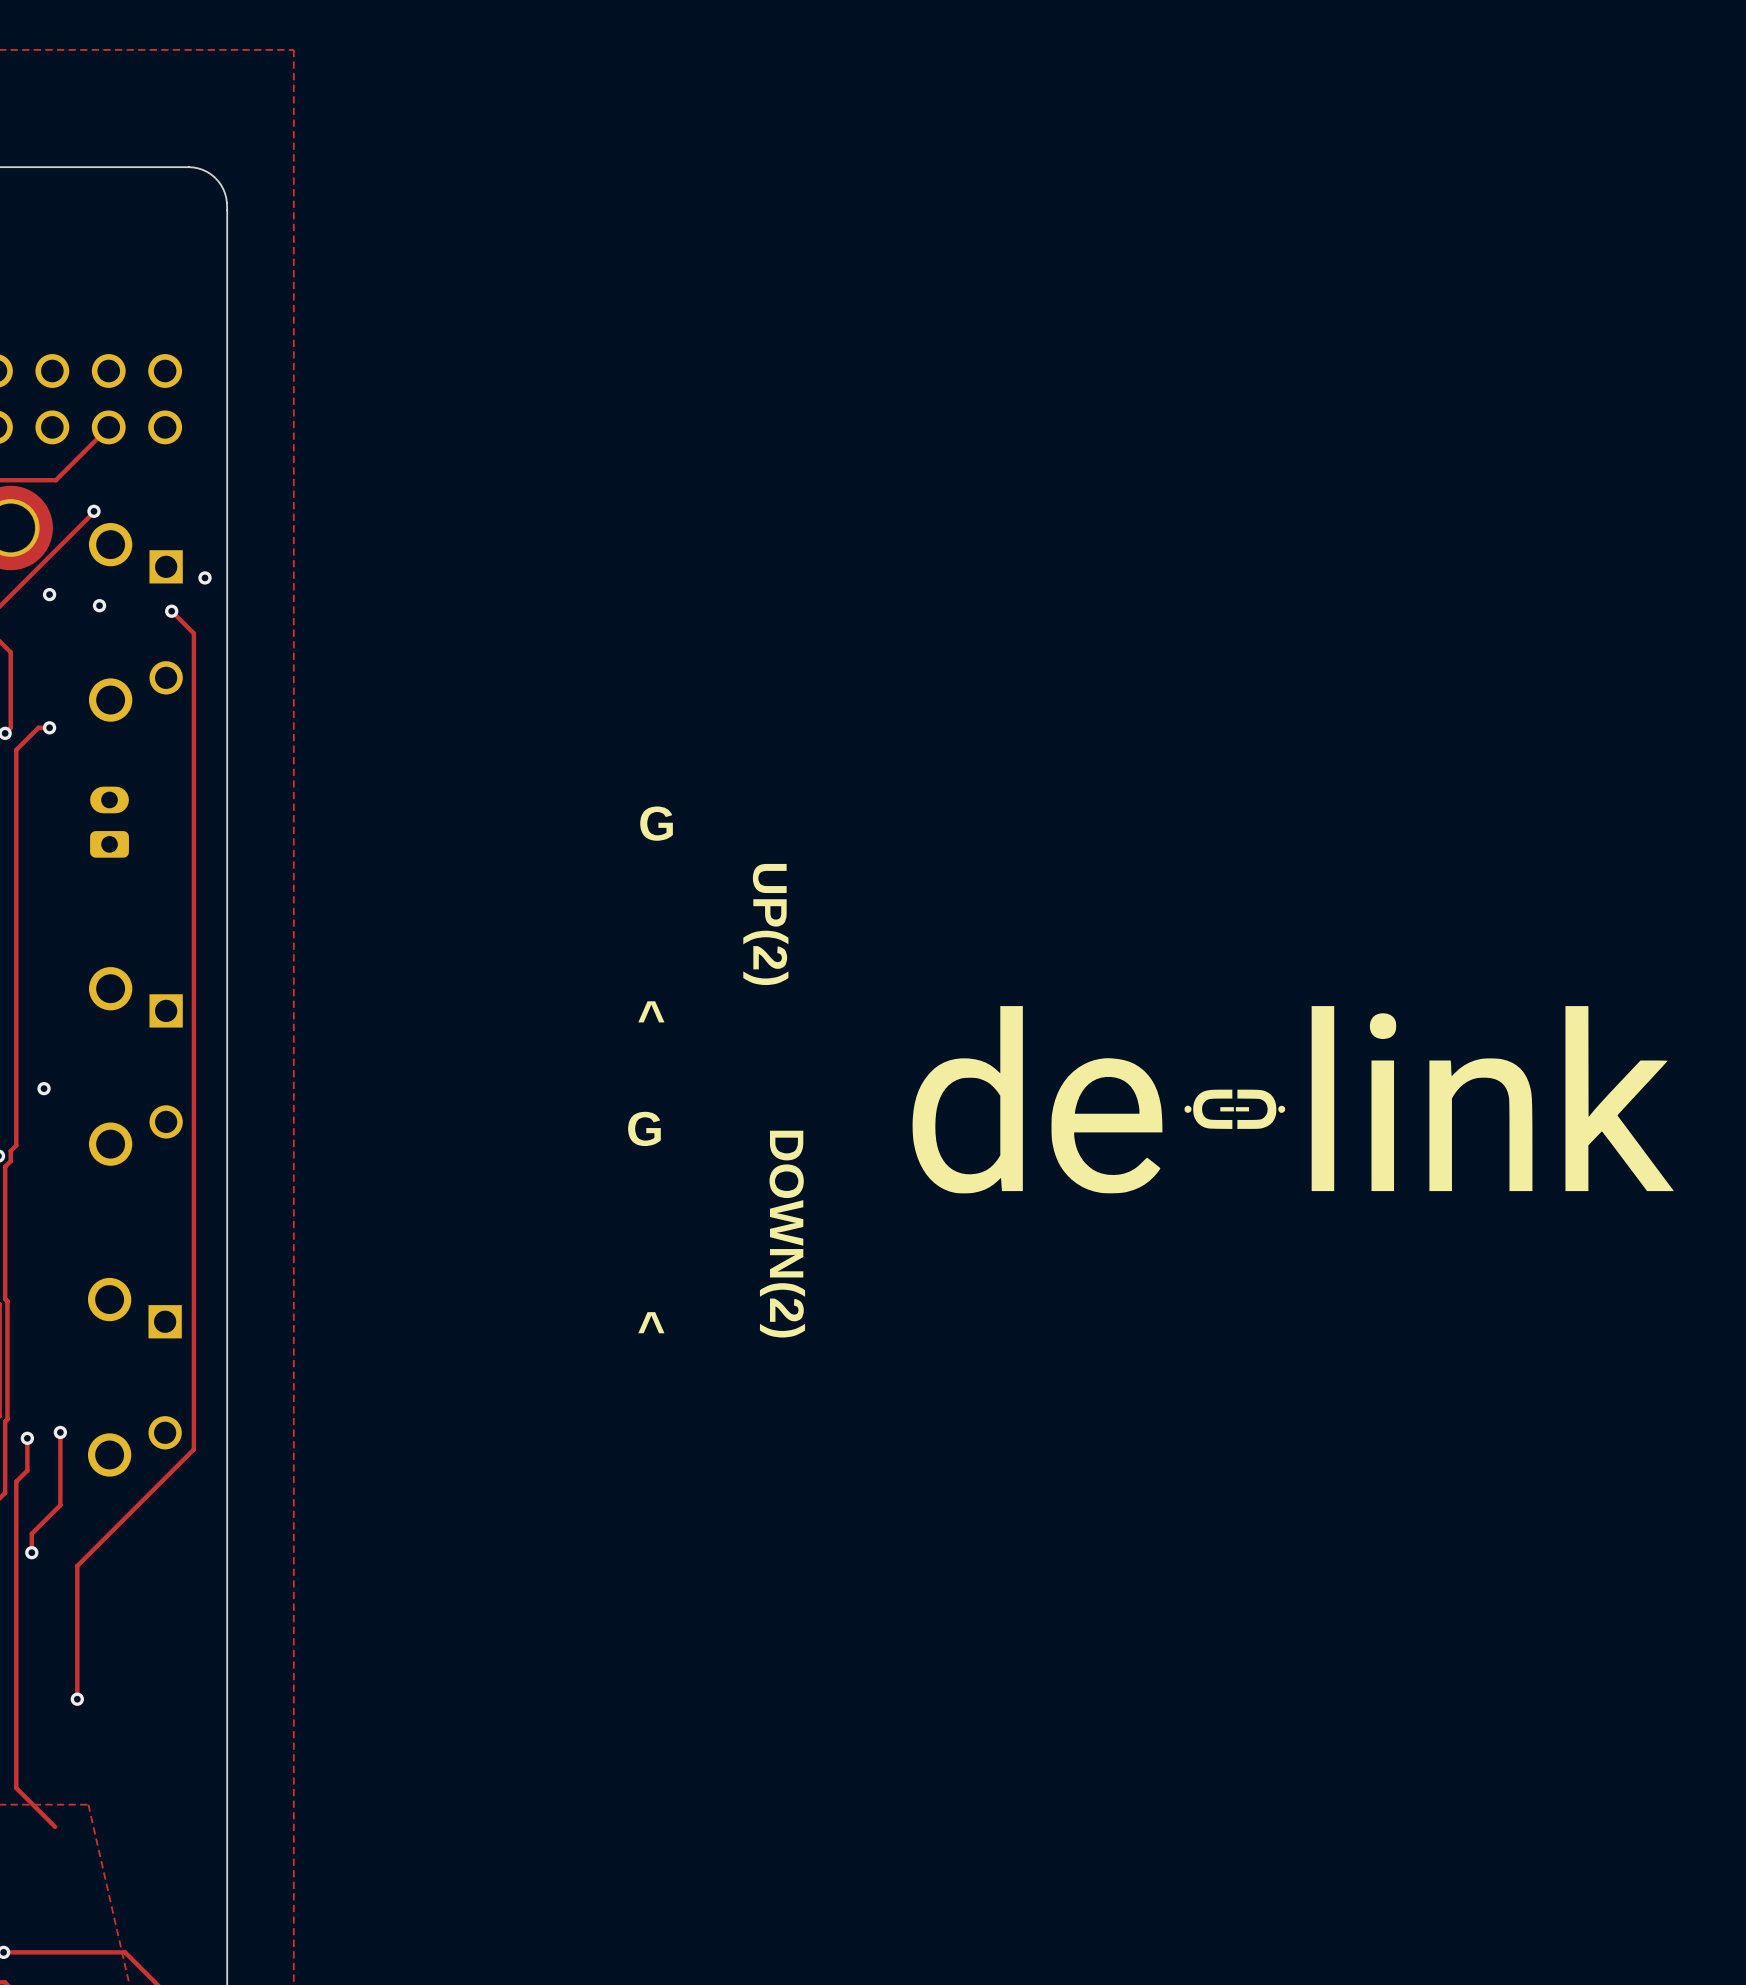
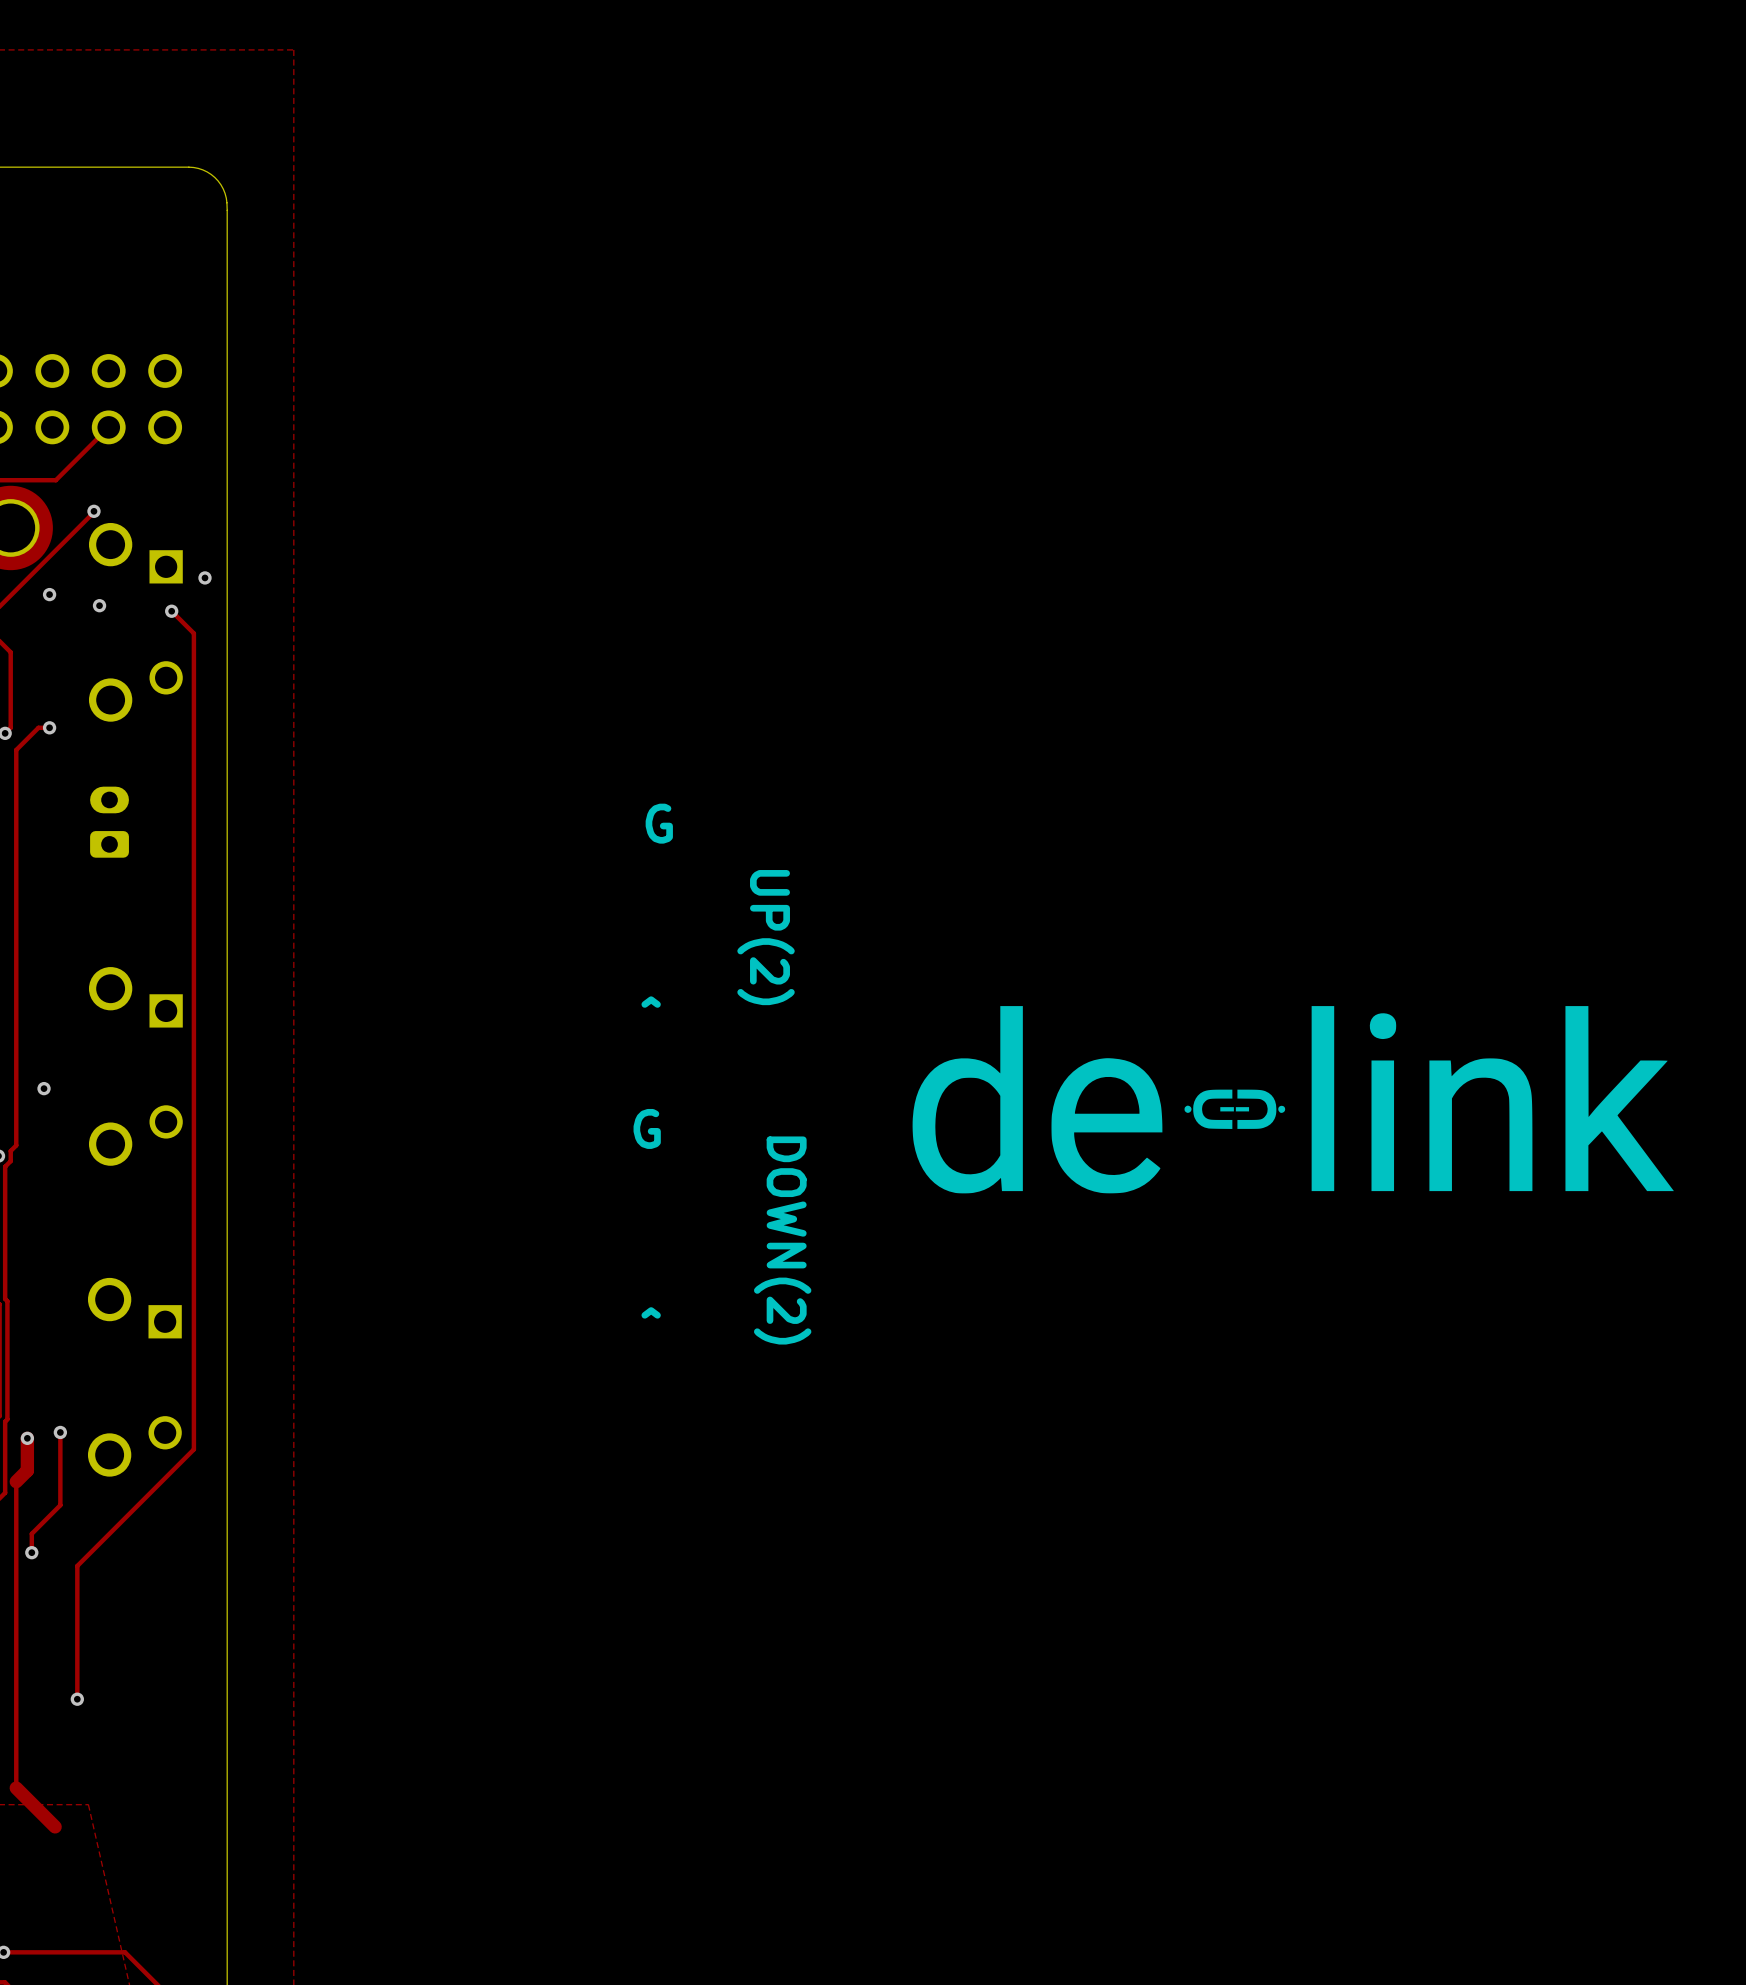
track width: thin (27, 1438) (27, 1470) (16, 1481) -> thick (27, 1438) (27, 1470) (16, 1481)
track width: thin (16, 1788) (55, 1826) -> thick (16, 1788) (55, 1826)

